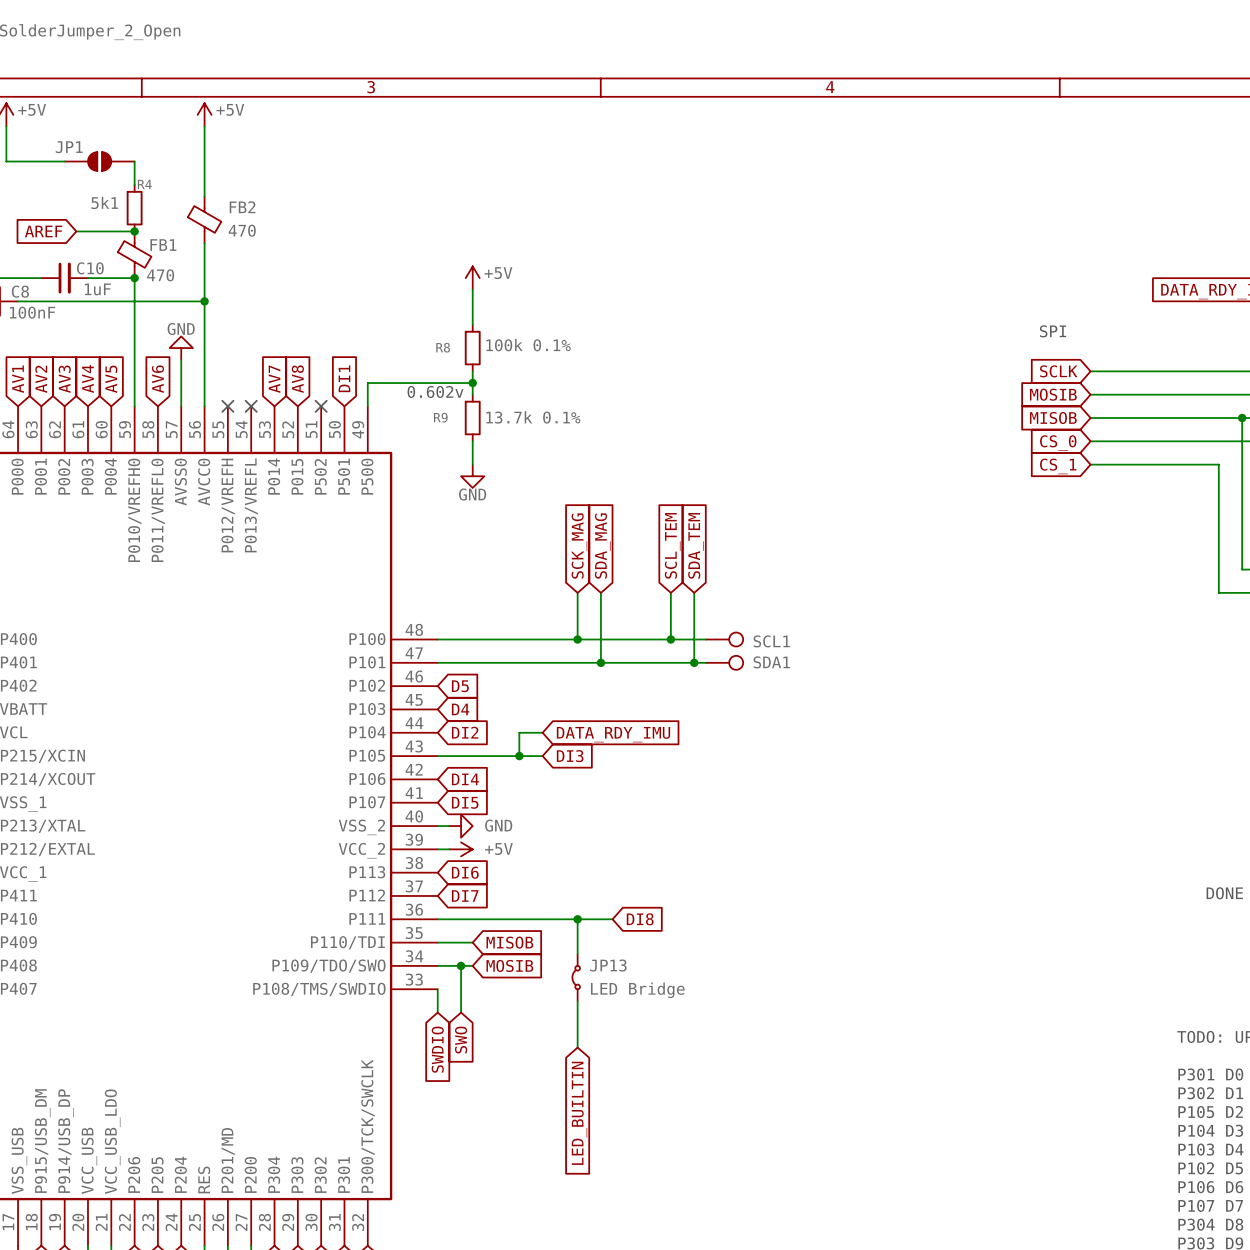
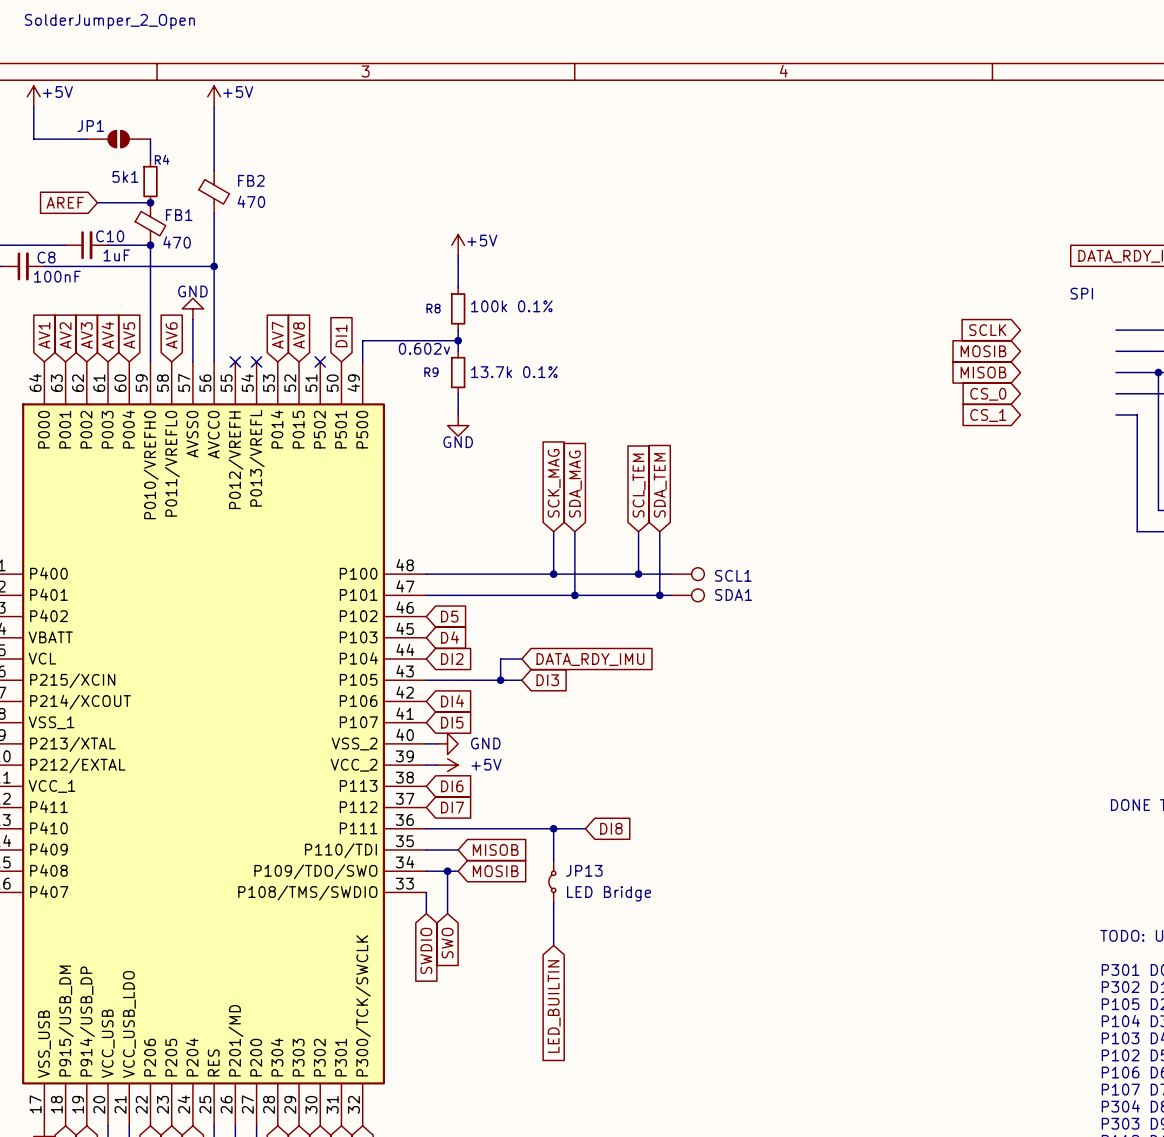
text position: SPI (1053, 331) -> SPI (1081, 293)
wire: (1090, 371) (1195, 371) -> none
wire: (1090, 394) (1195, 394) -> none
wire: (1090, 418) (1195, 418) -> none
wire: (1090, 441) (1195, 441) -> none
wire: (1090, 464) (1195, 464) -> none

